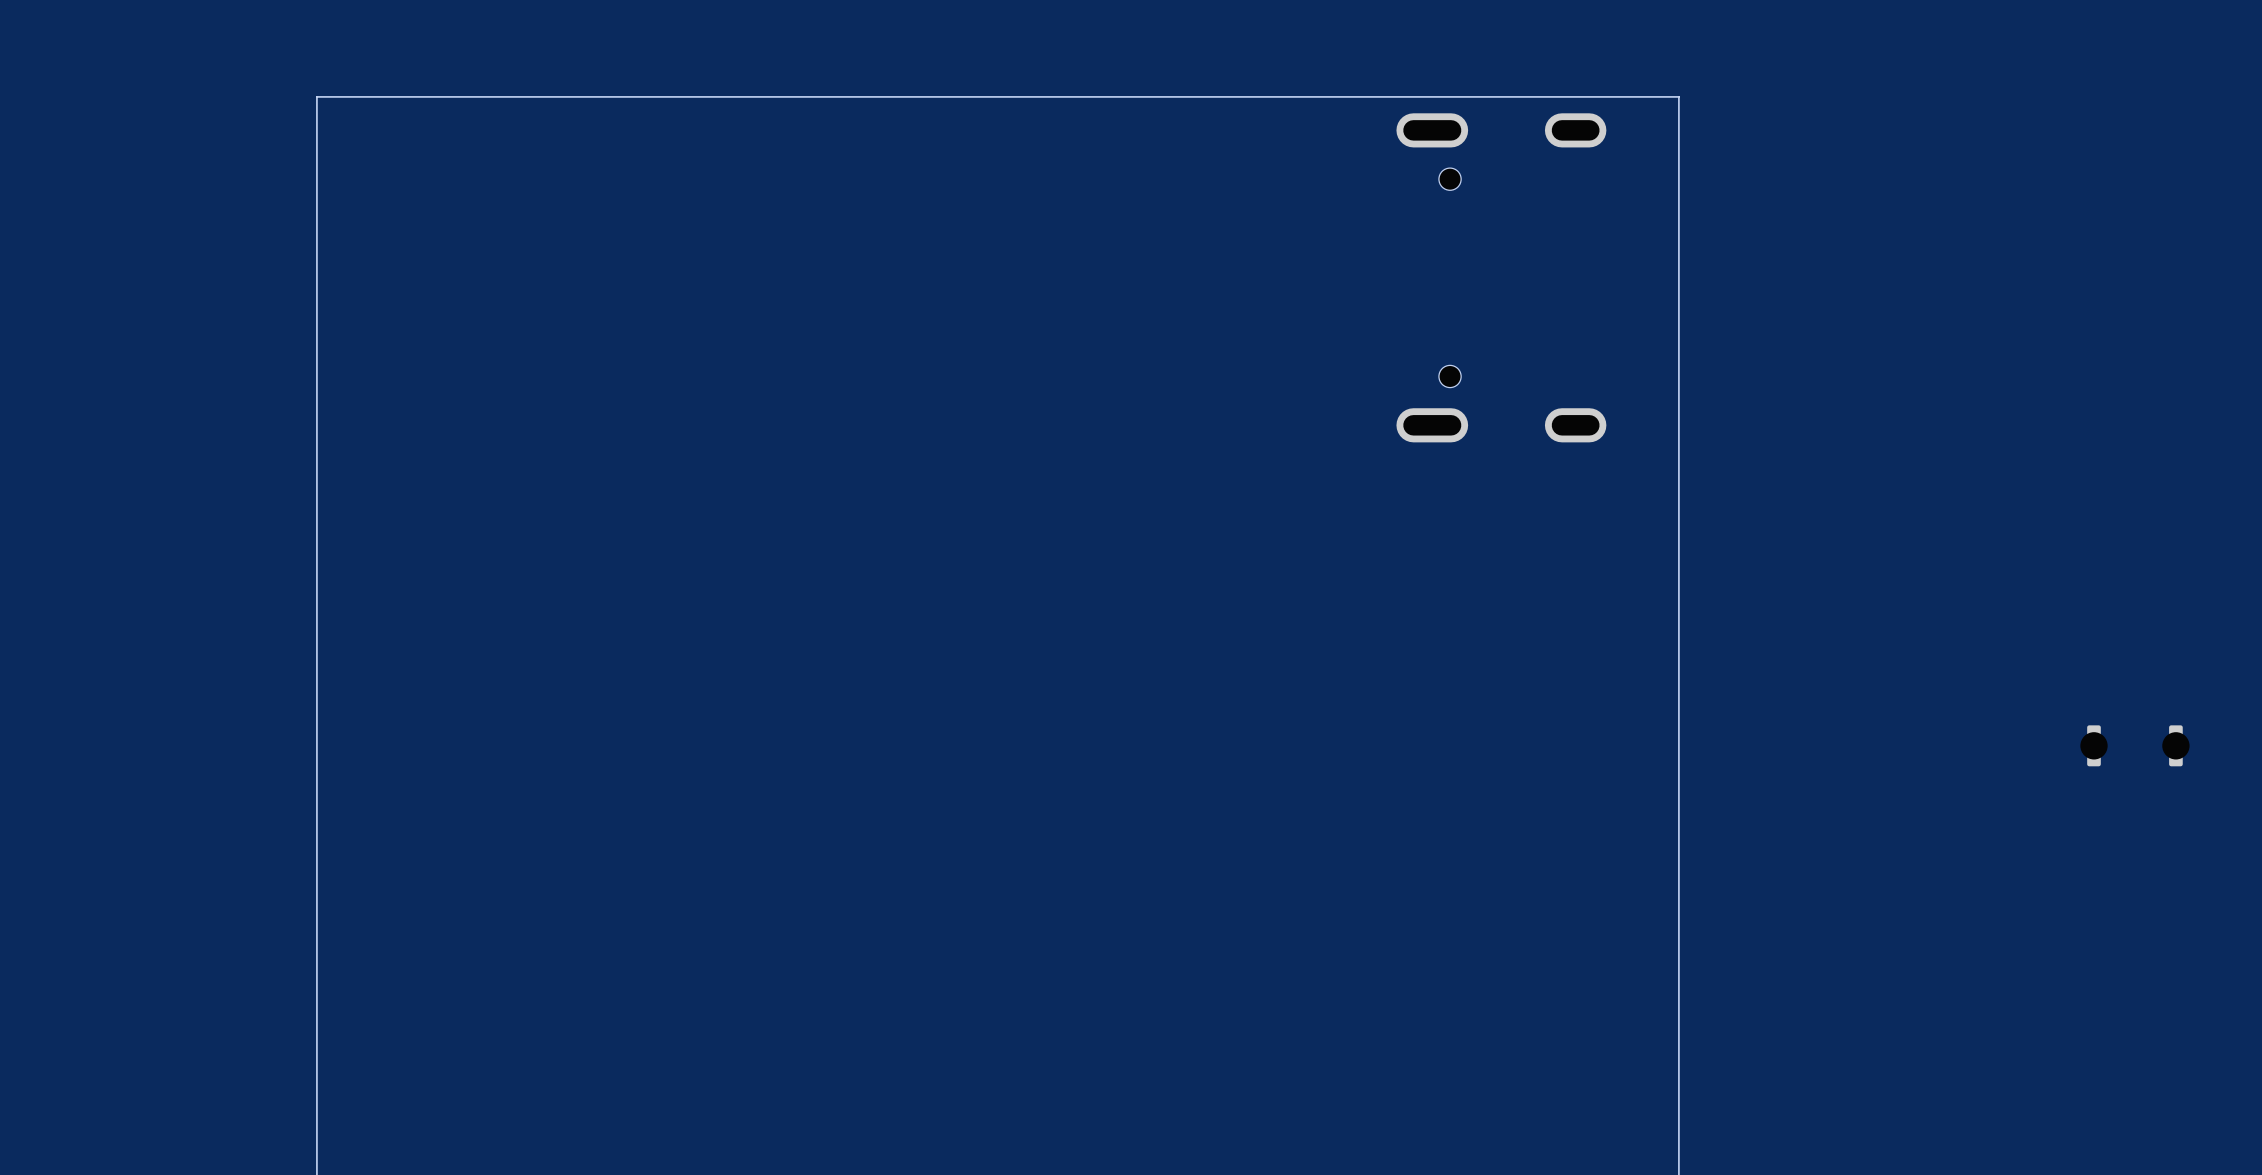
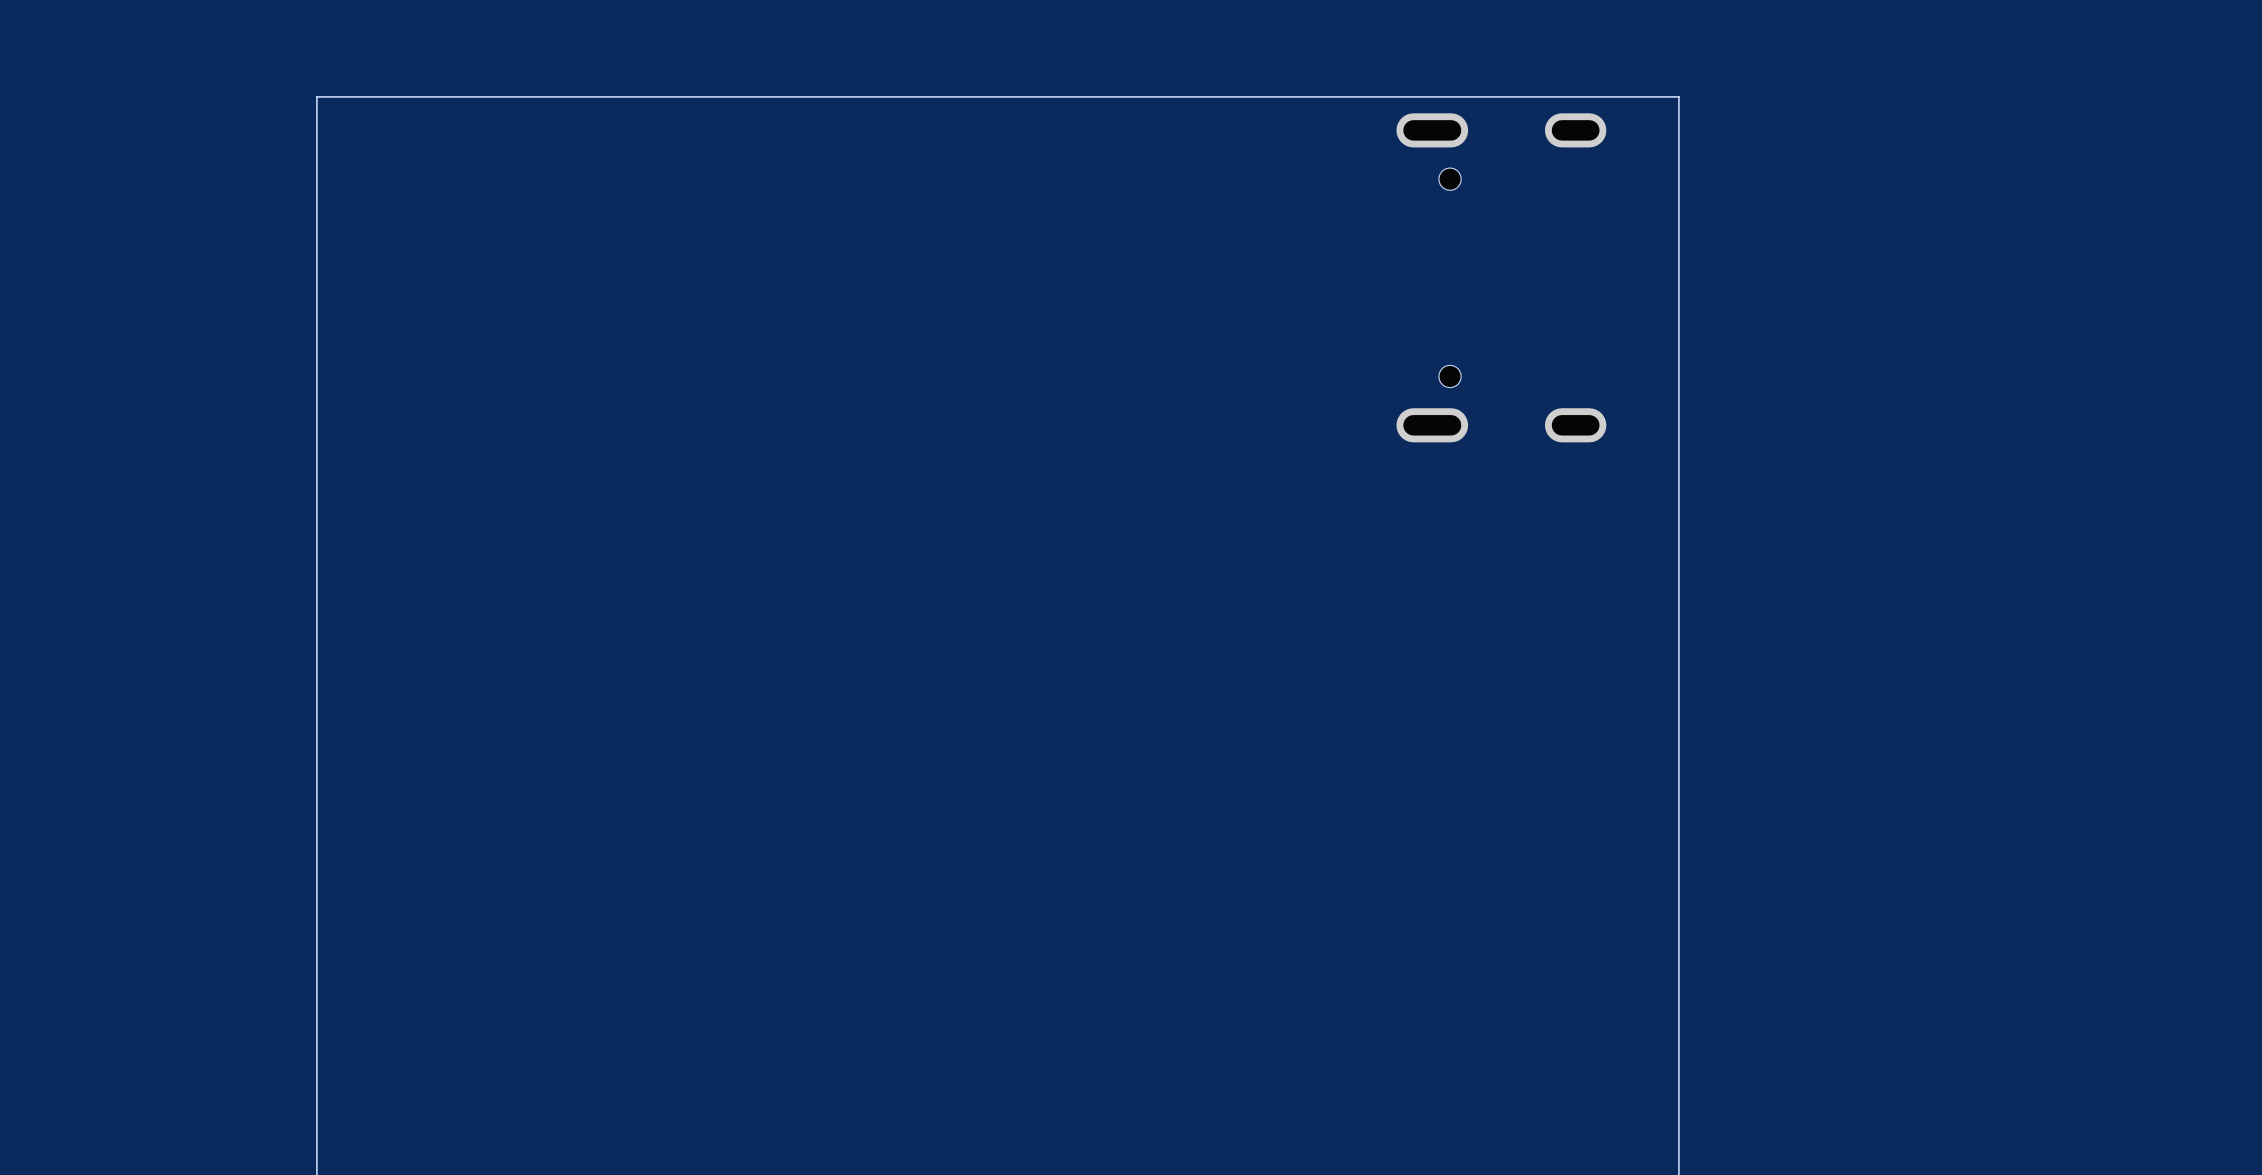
part: (2134, 745) -> none

